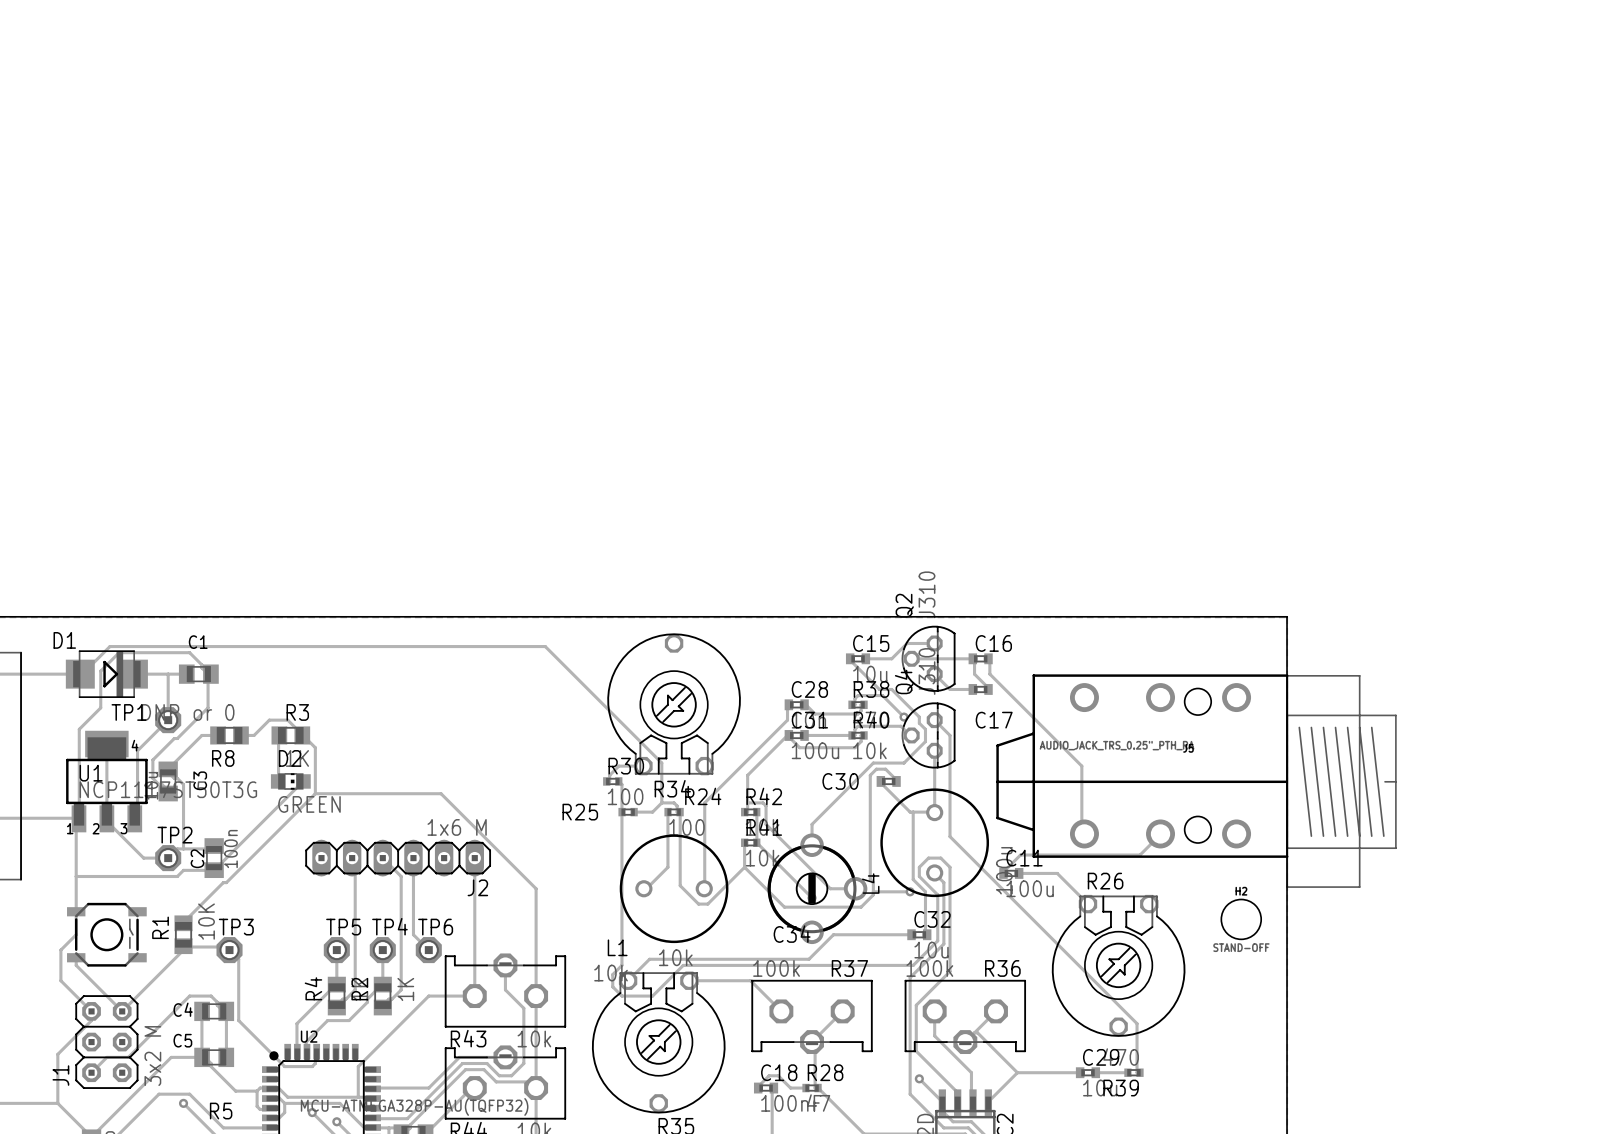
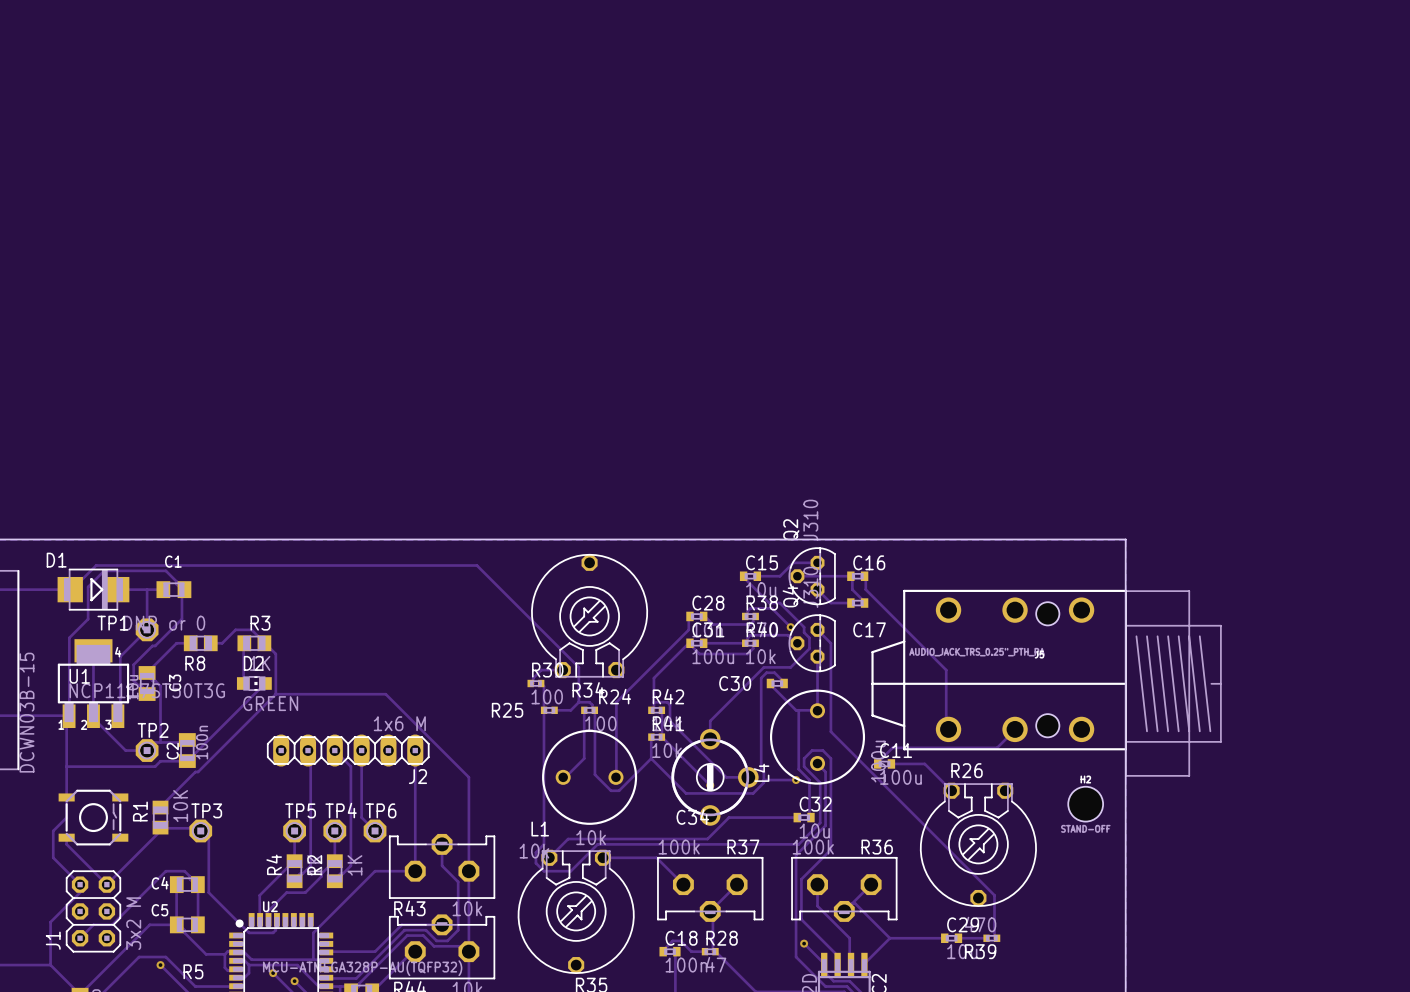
part value: none -> DCWN03B-15 (26, 712)
C18 value: 100nF (791, 1103) -> 100n (686, 965)

